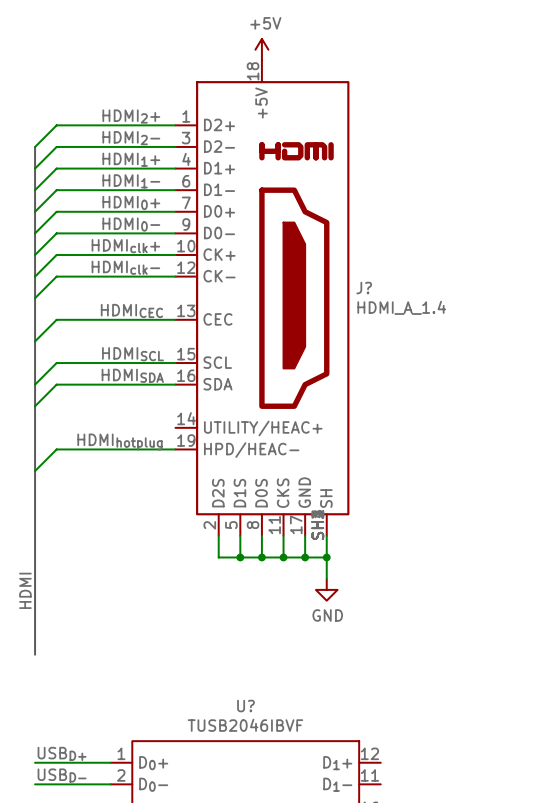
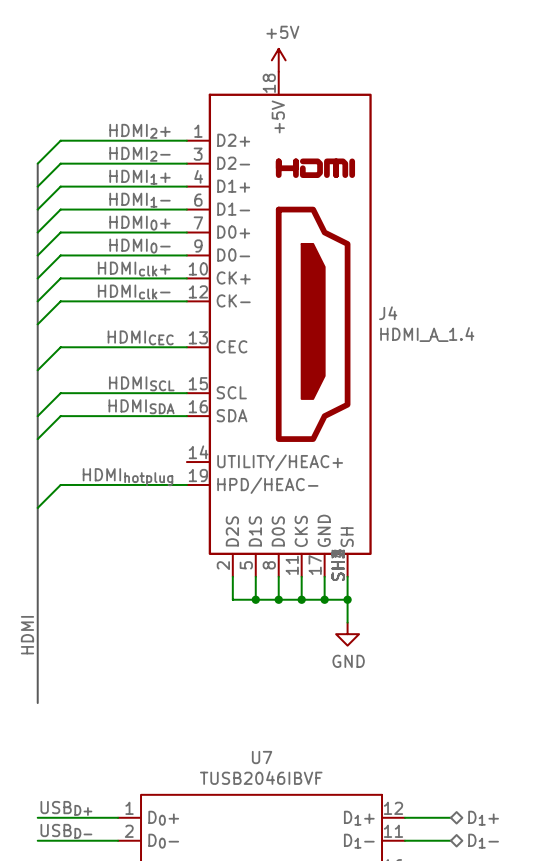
J? name: J? (364, 288) -> J4 (388, 313)
U? name: U? (245, 706) -> U7 (262, 757)
wire: none -> (404, 817) (450, 817)
hierarchical label: none -> D1+ (483, 818)
wire: none -> (404, 840) (450, 840)
hierarchical label: none -> D1- (483, 841)

